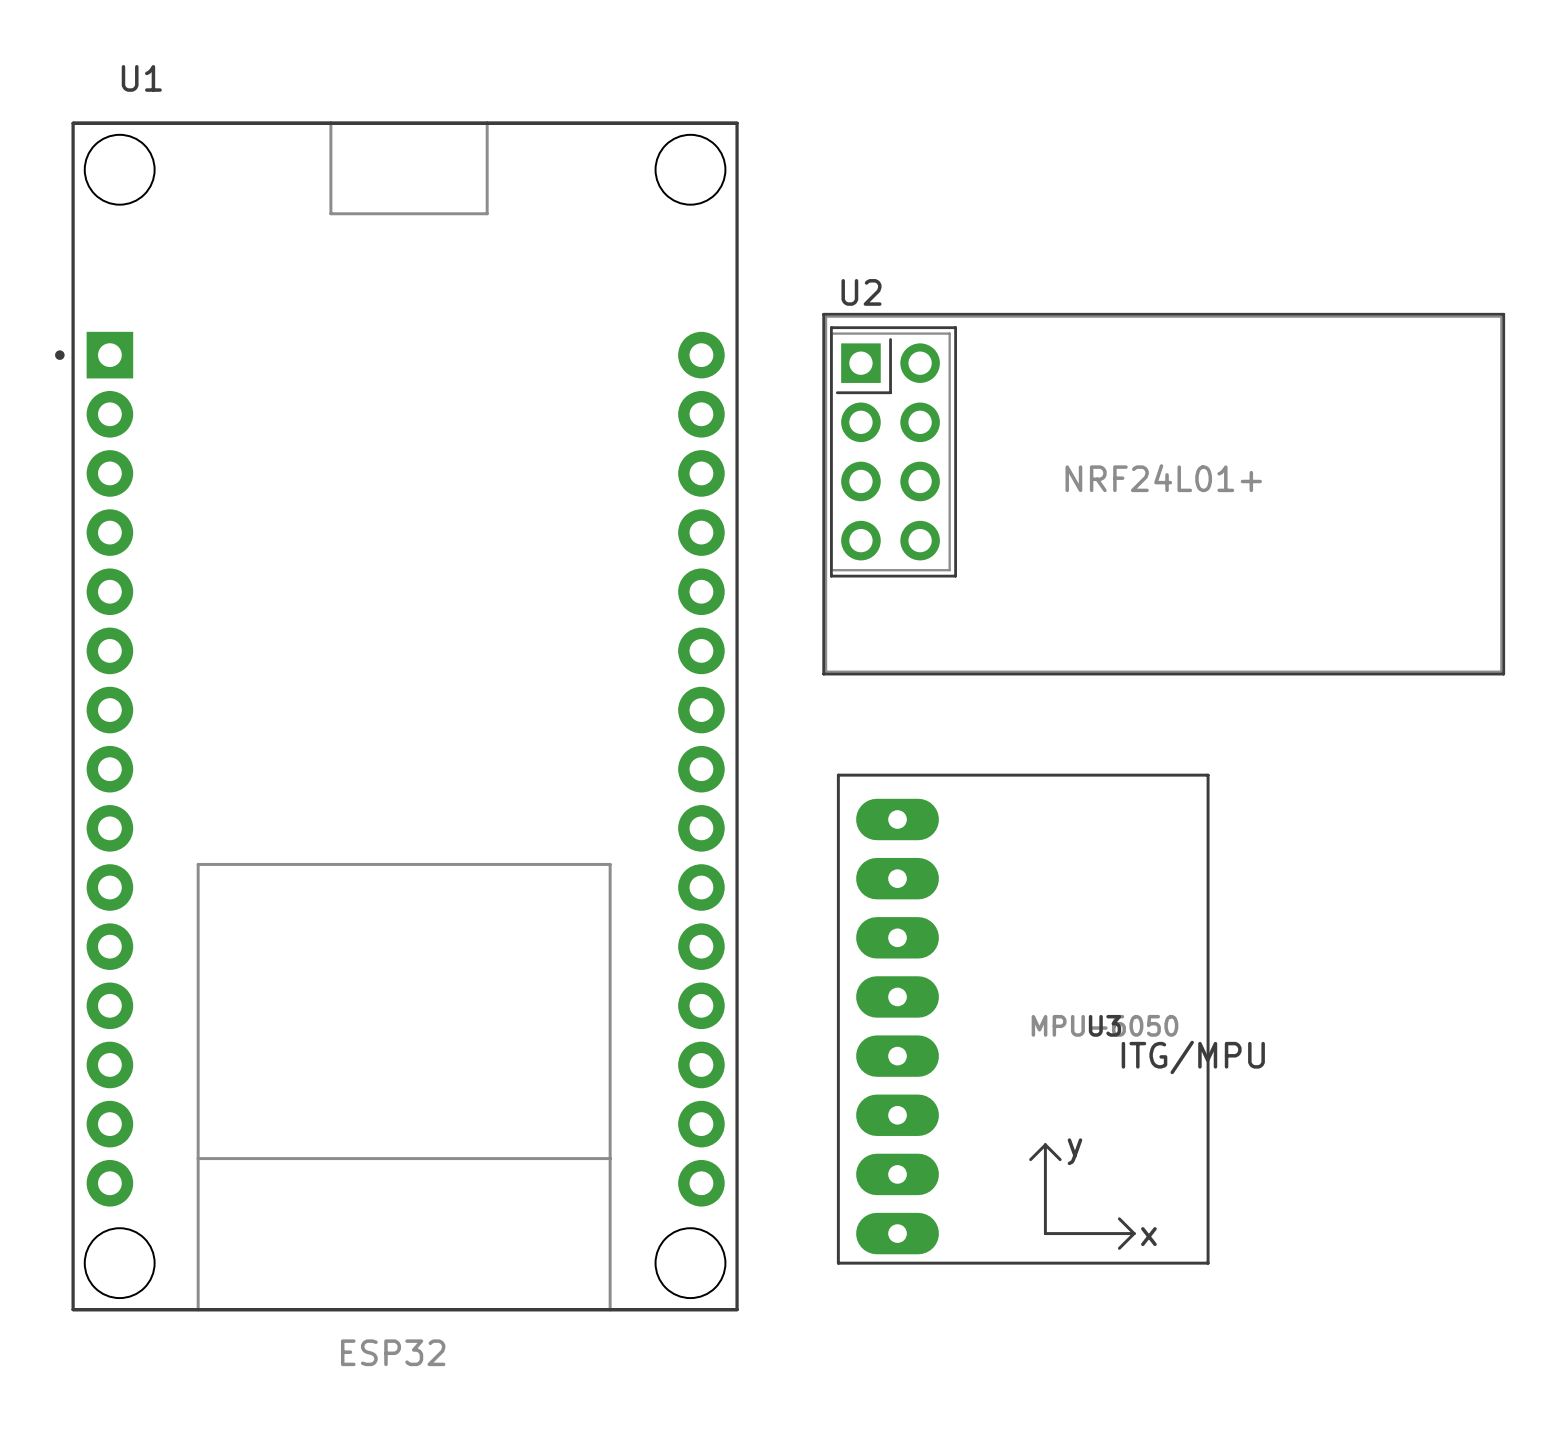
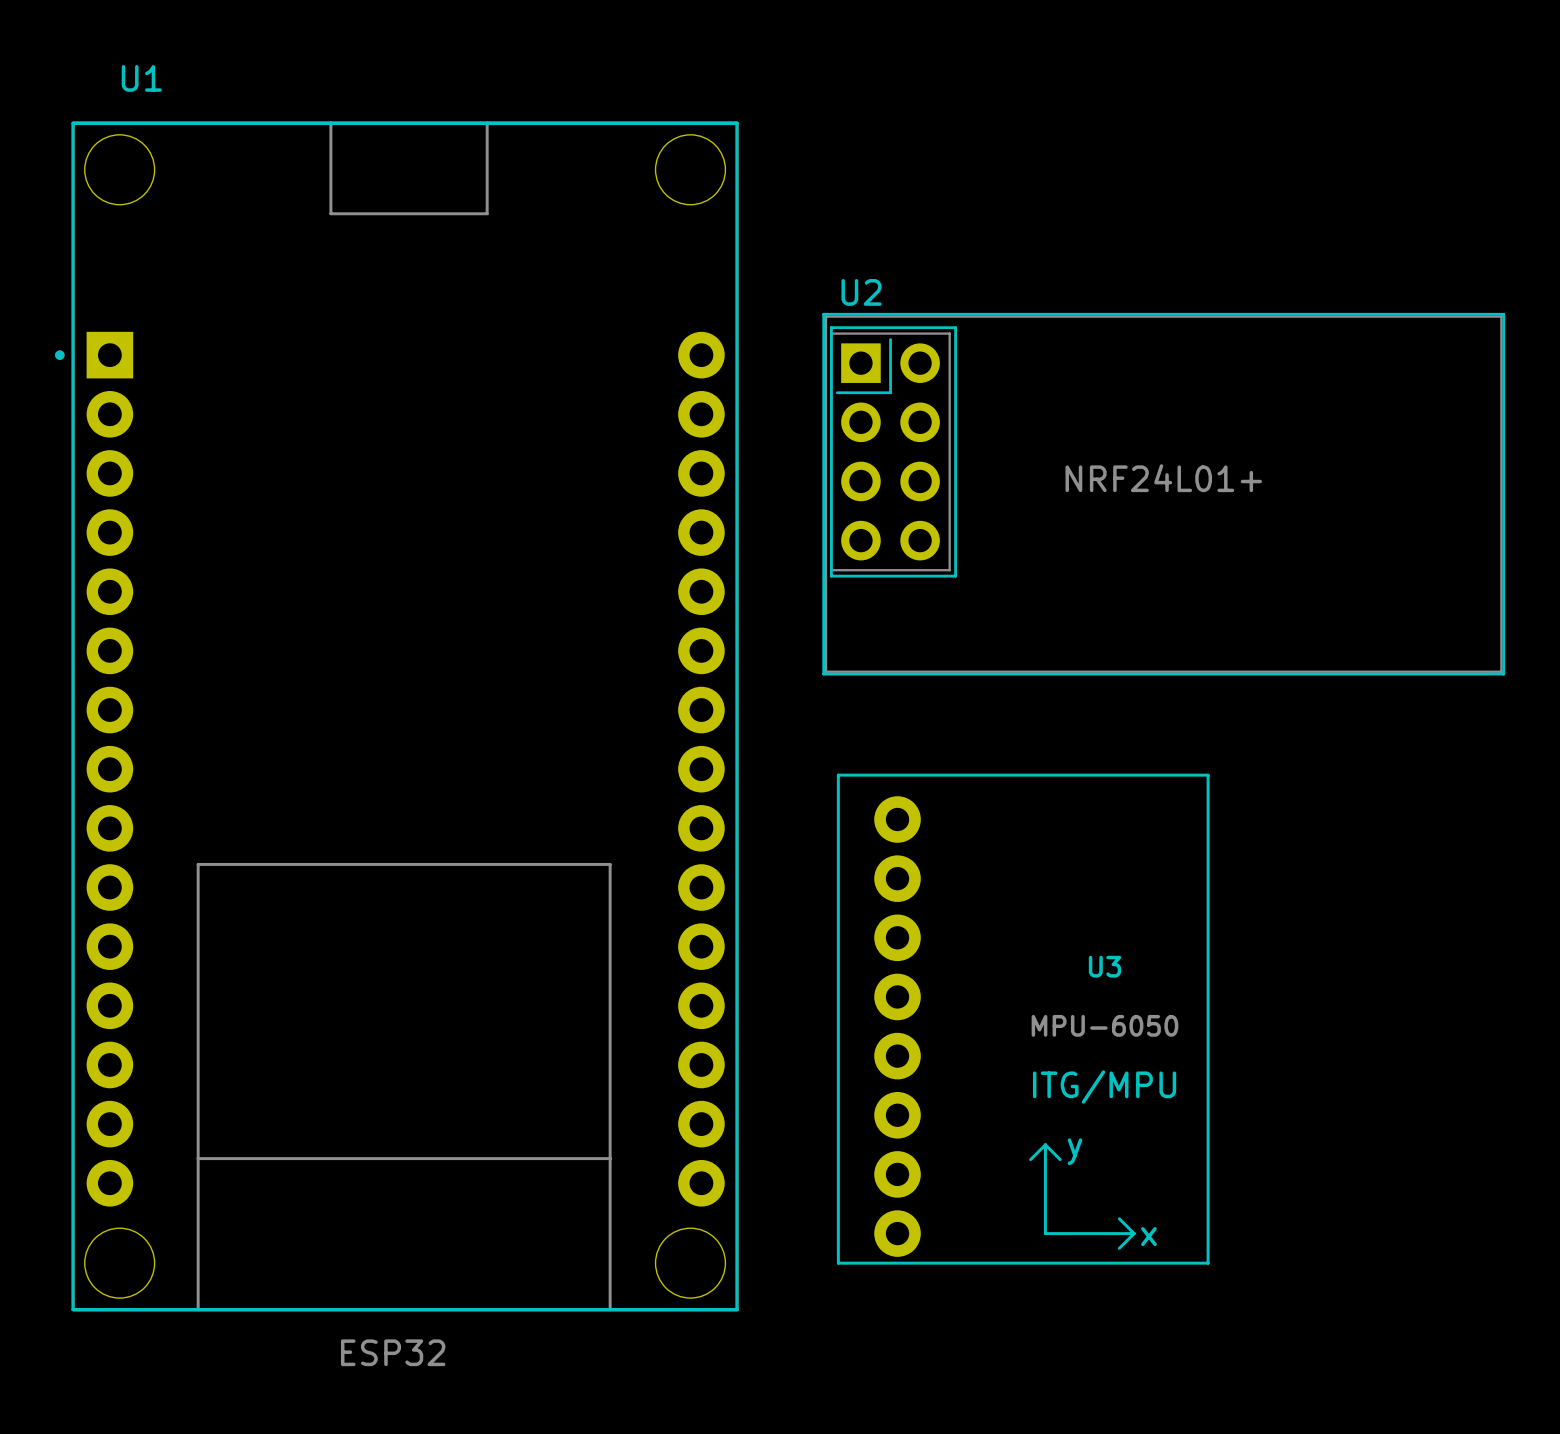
U3 footprint: [836, 773, 1210, 1265] -> [836, 773, 1210, 1265]
U3 name position: U3 (1104, 1025) -> U3 (1104, 966)

